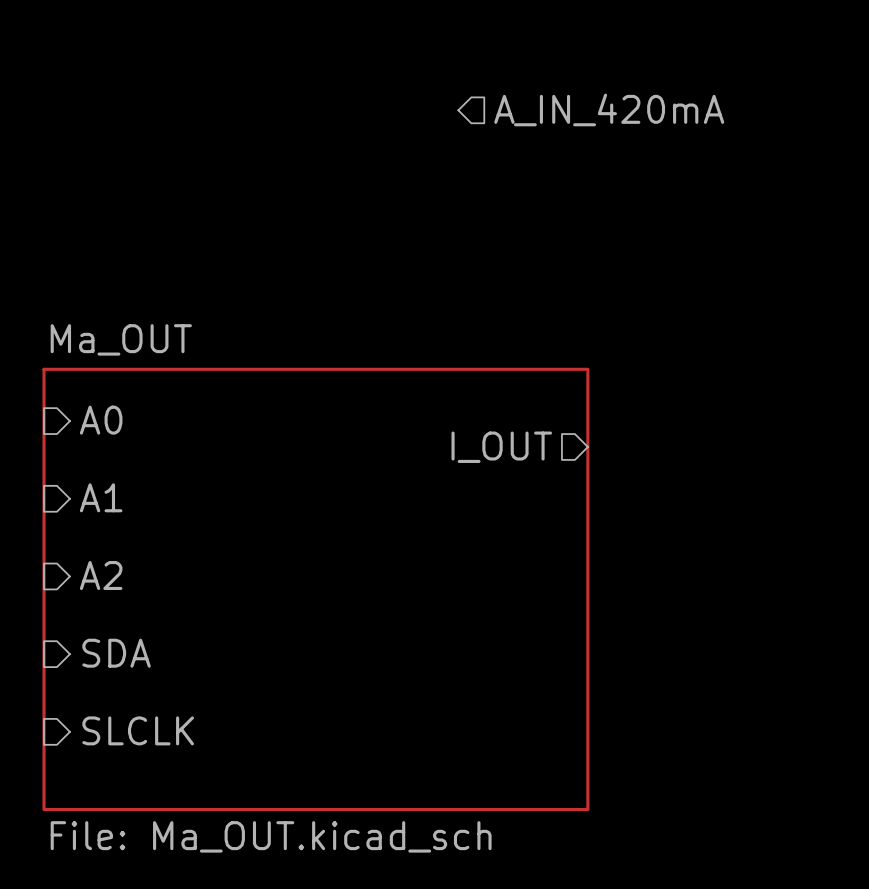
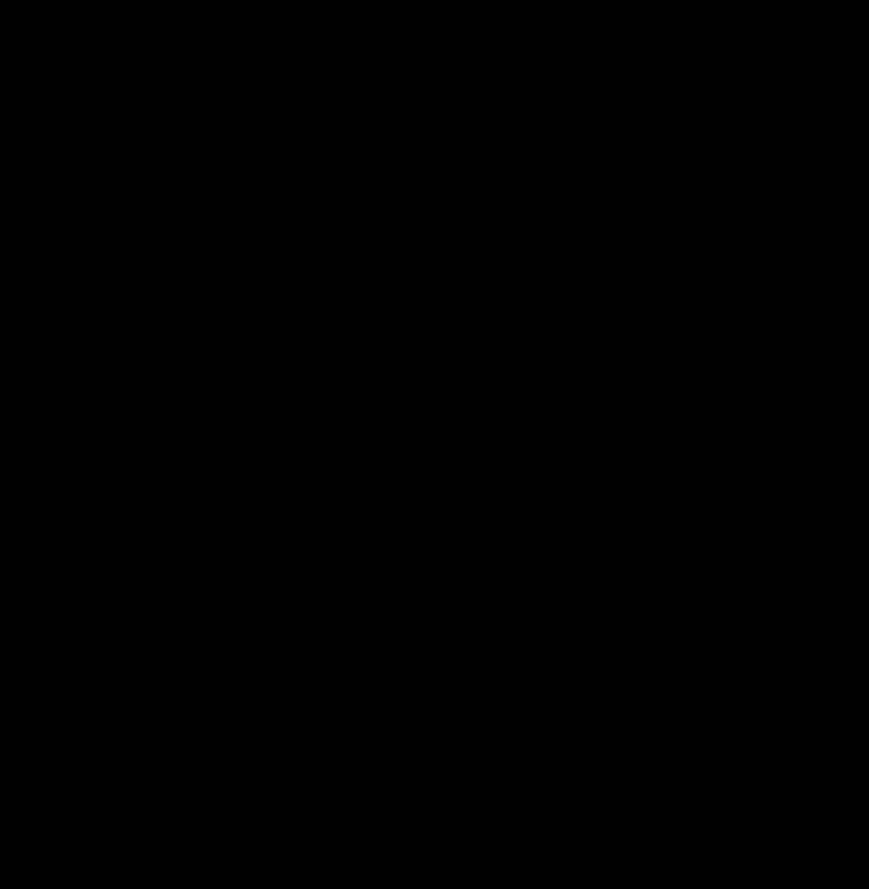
hierarchical label: A_IN_420mA (609, 109) -> none
sheet pin: A0 (101, 420) -> none
sheet pin: I_OUT (501, 447) -> none
sheet pin: A1 (101, 497) -> none
sheet pin: A2 (101, 575) -> none
sheet Ma_OUT: File: Ma_OUT.kicad_sch (315, 589) -> none
sheet pin: SDA (116, 653) -> none
sheet pin: SLCLK (138, 730) -> none

